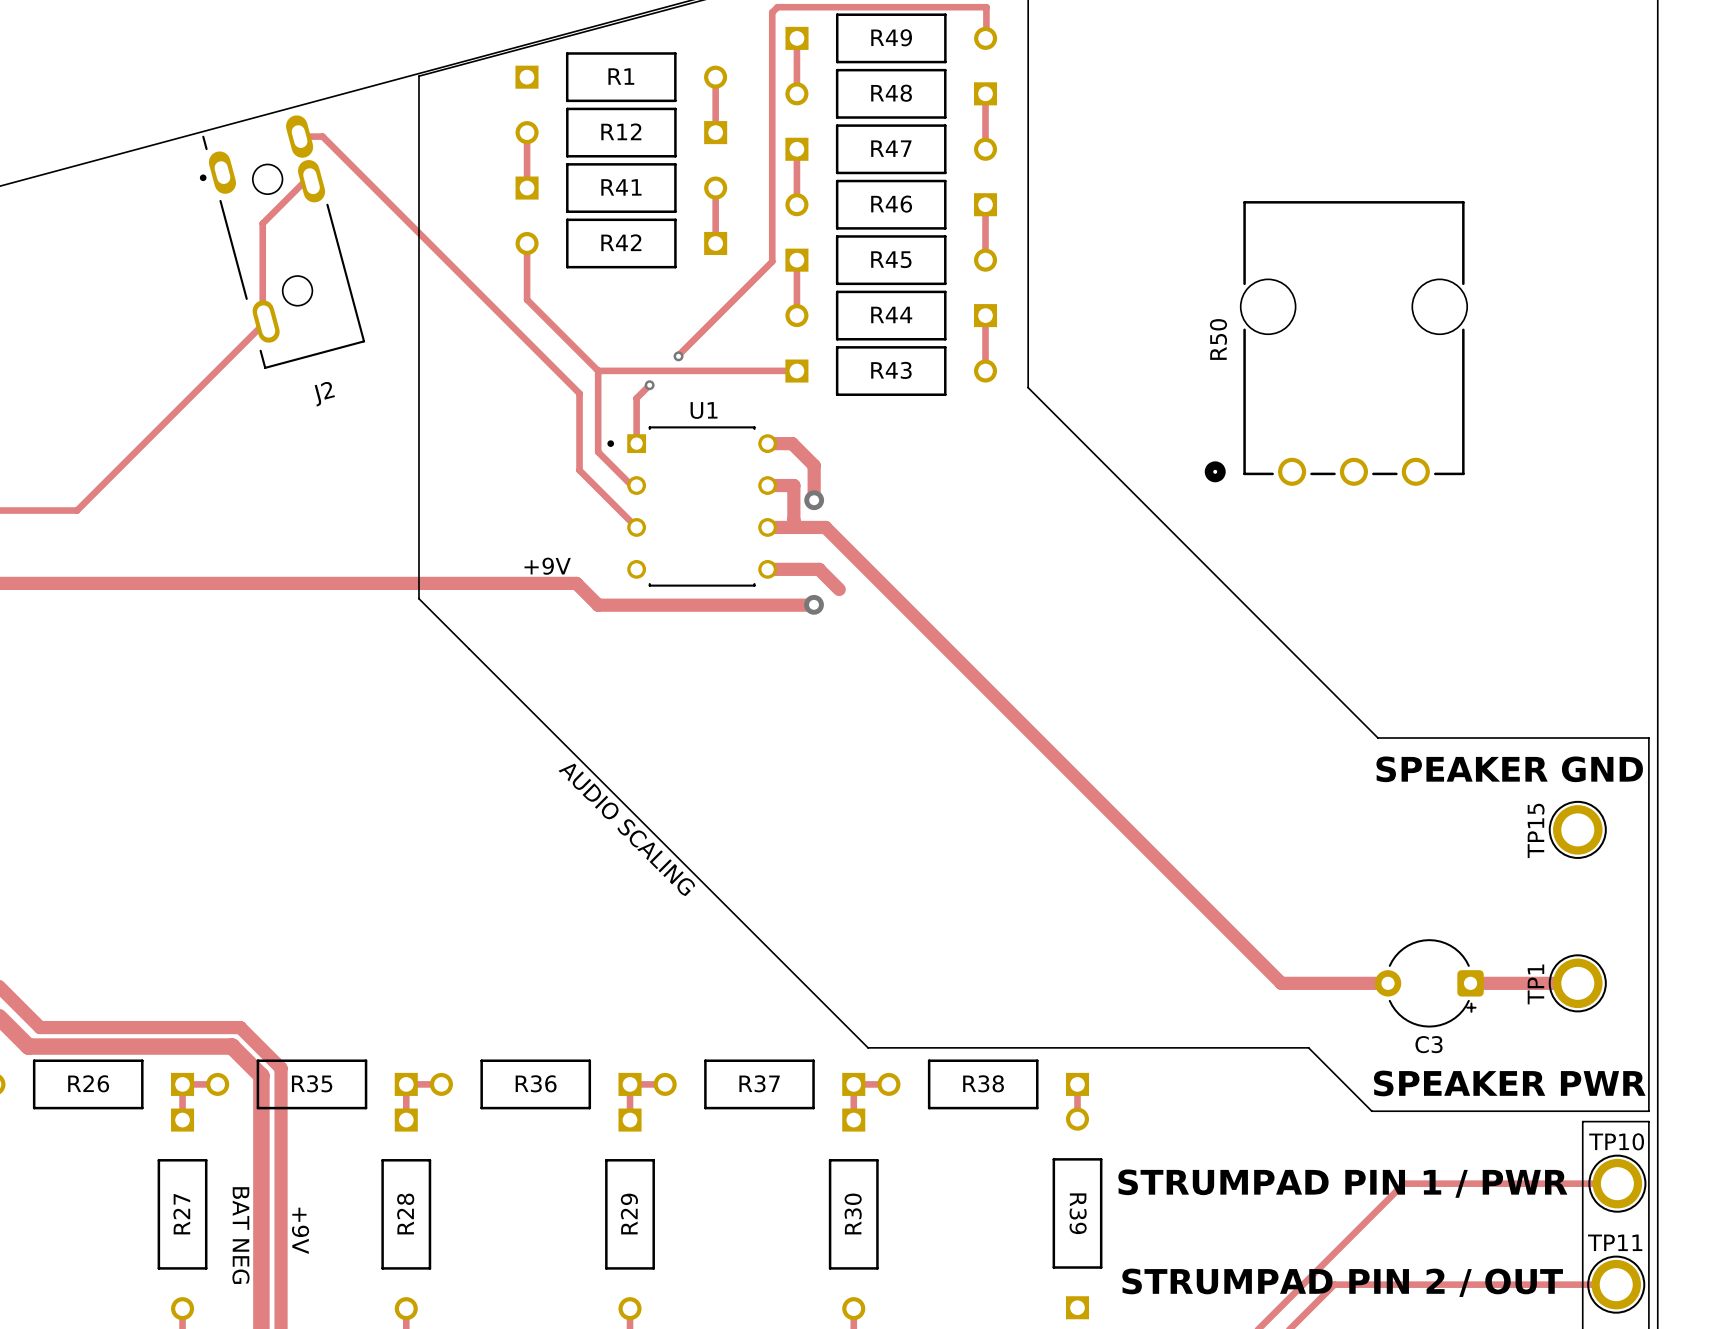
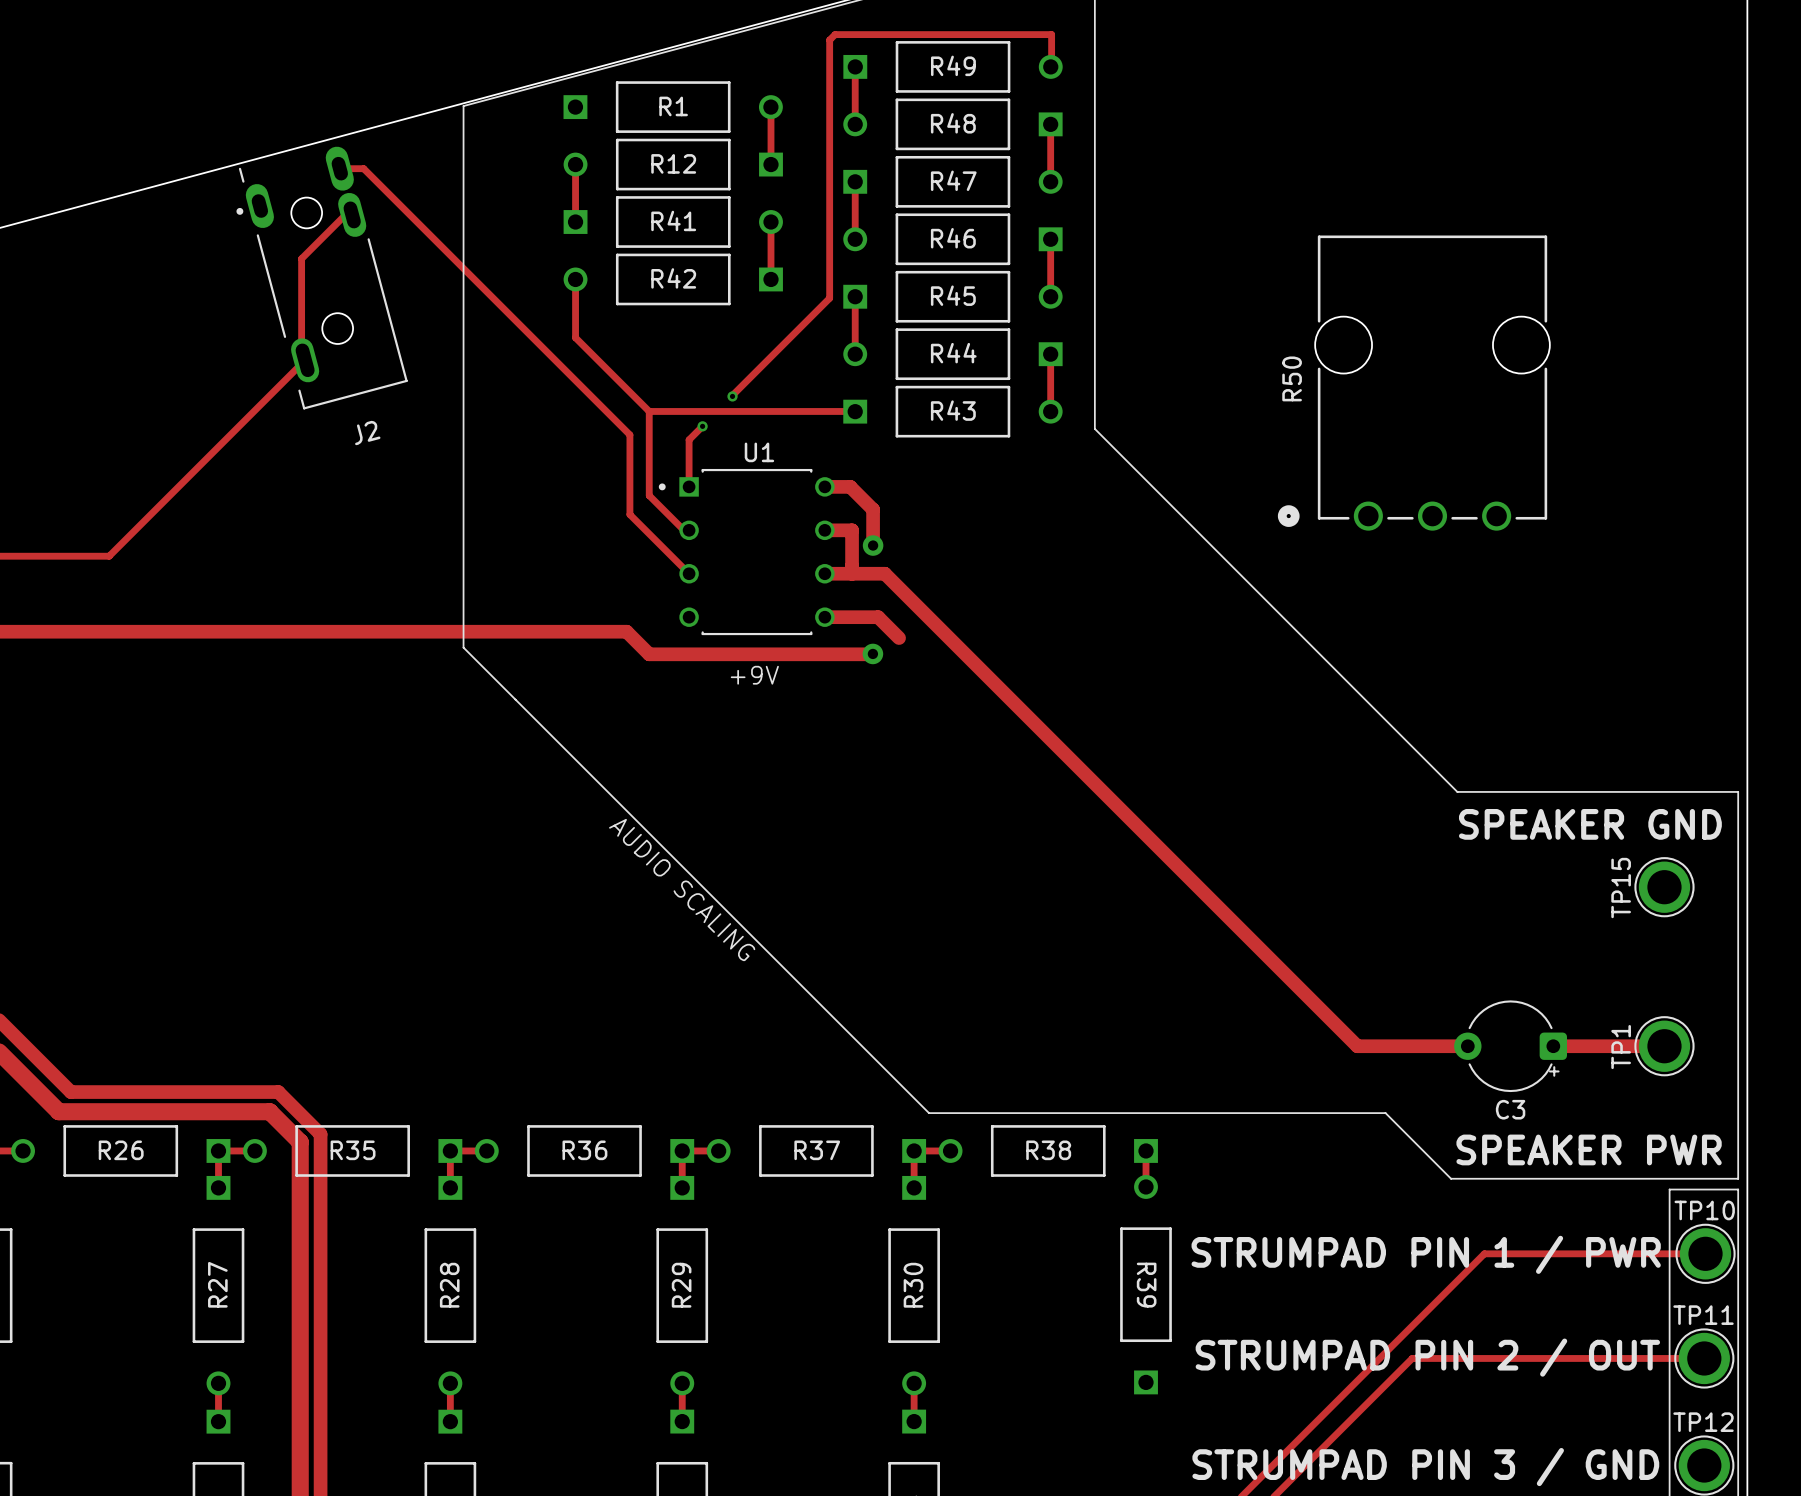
text position: +9V (547, 566) -> +9V (754, 675)
text: +9V (300, 1230) -> none
text: BAT NEG (240, 1235) -> none

